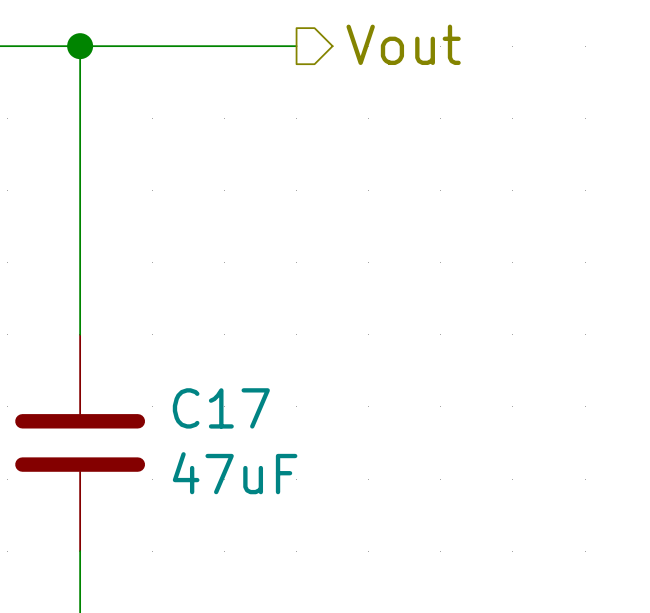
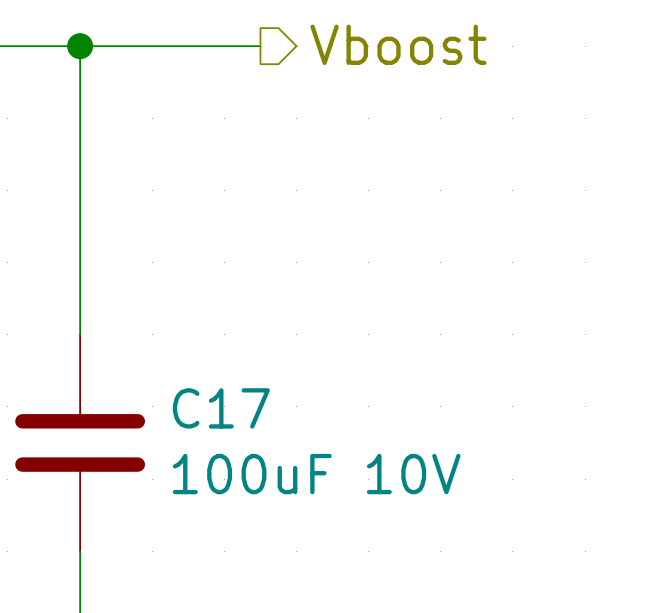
hierarchical label: none -> Vboost (398, 44)
hierarchical label: Vout (403, 44) -> none
wire: (260, 46) (296, 46) -> none
C17 value: 47uF (235, 473) -> 100uF 10V (316, 474)

